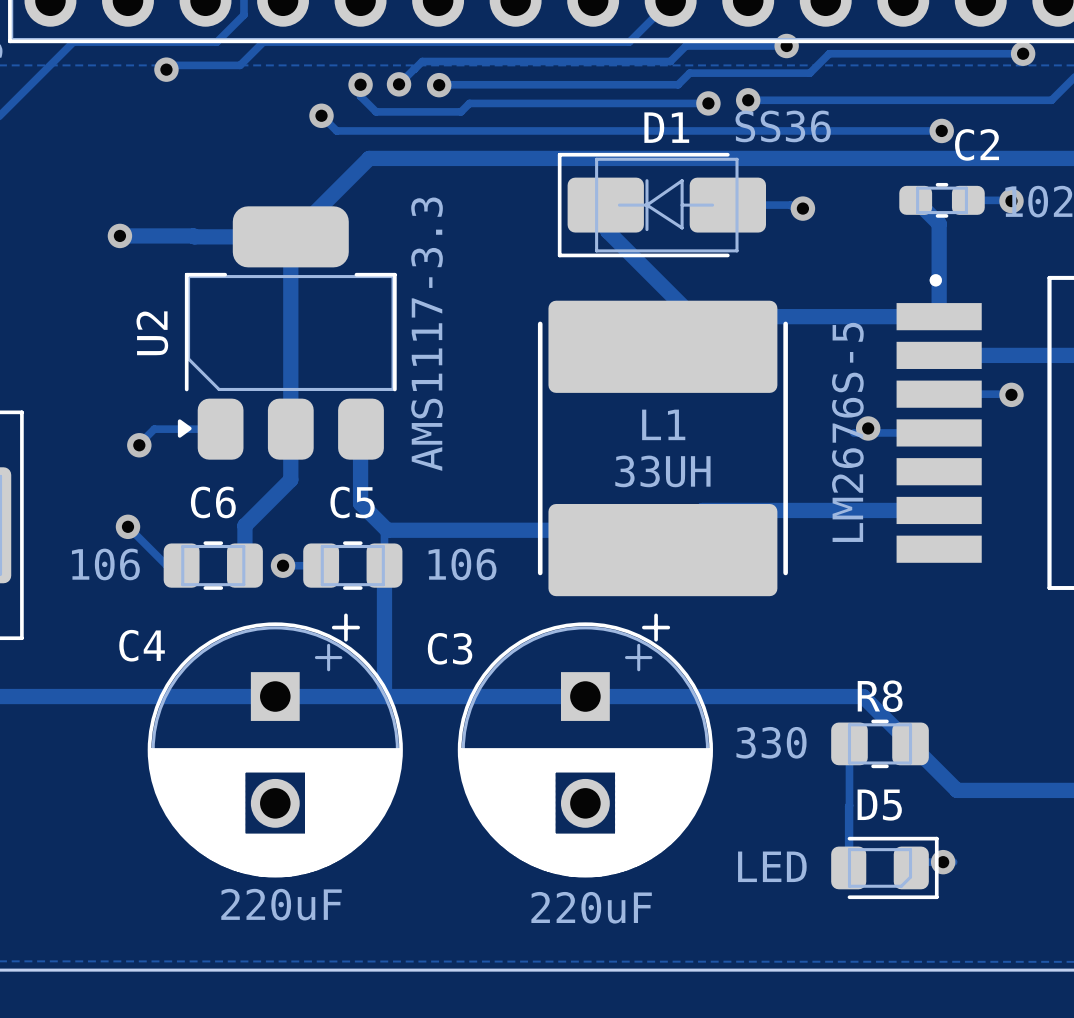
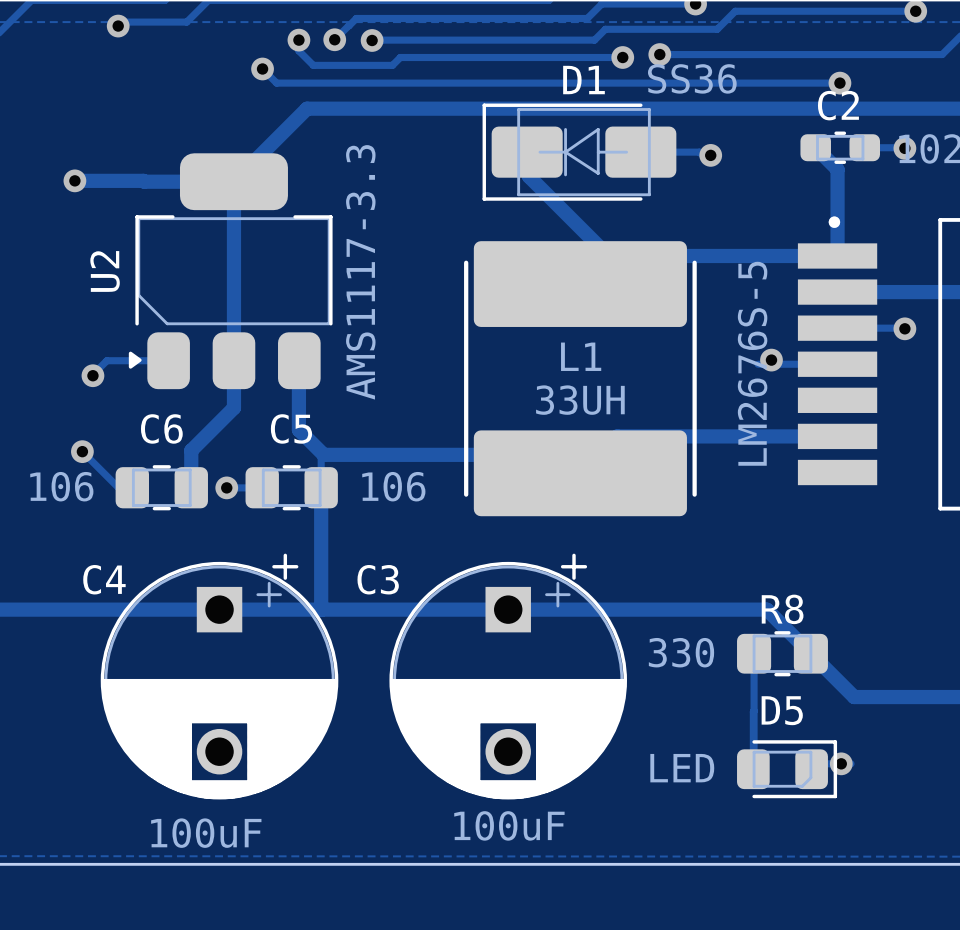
C2 name position: C2 (977, 144) -> C2 (838, 105)
C4 footprint: [147, 613, 403, 878] -> [100, 553, 339, 800]
C3 footprint: [457, 613, 713, 878] -> [389, 553, 628, 800]
C4 value: 220uF (281, 904) -> 100uF (206, 833)
C3 value: 220uF (591, 907) -> 100uF (509, 825)

